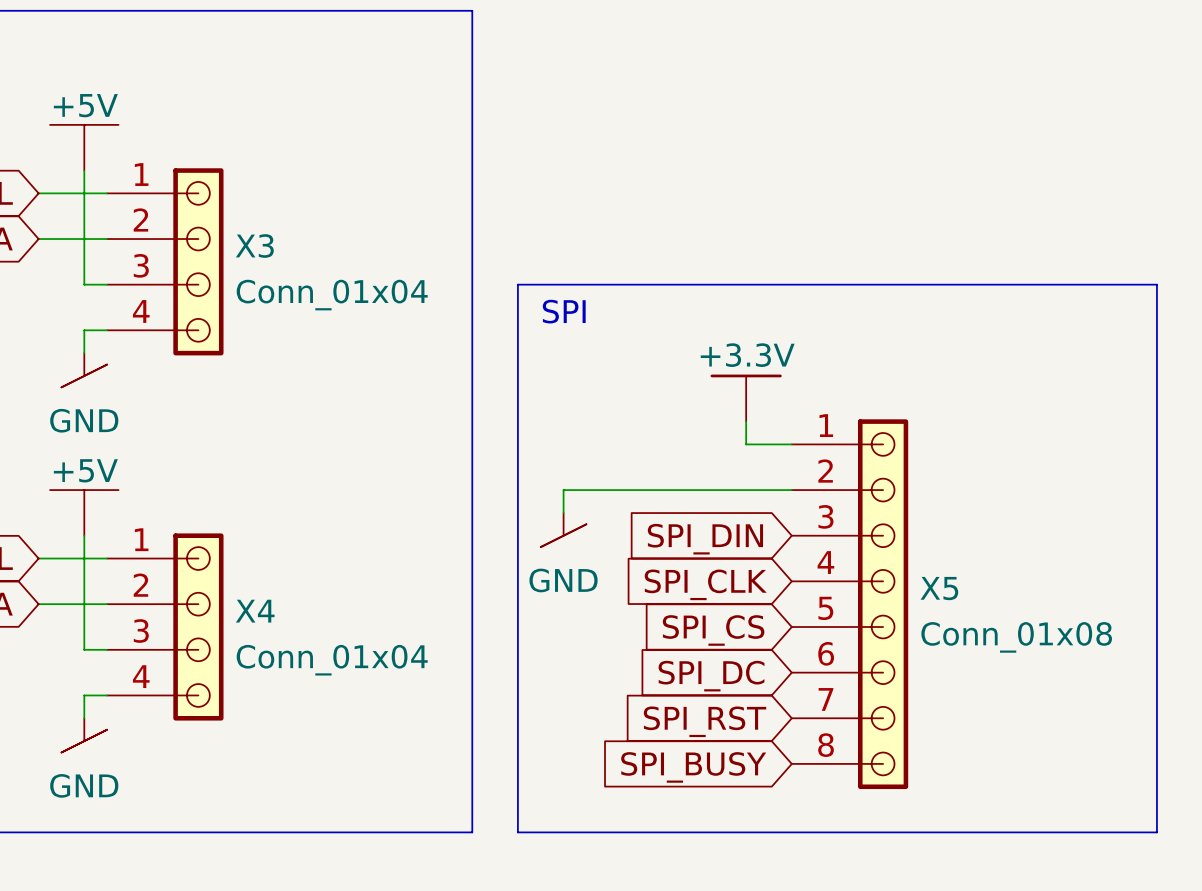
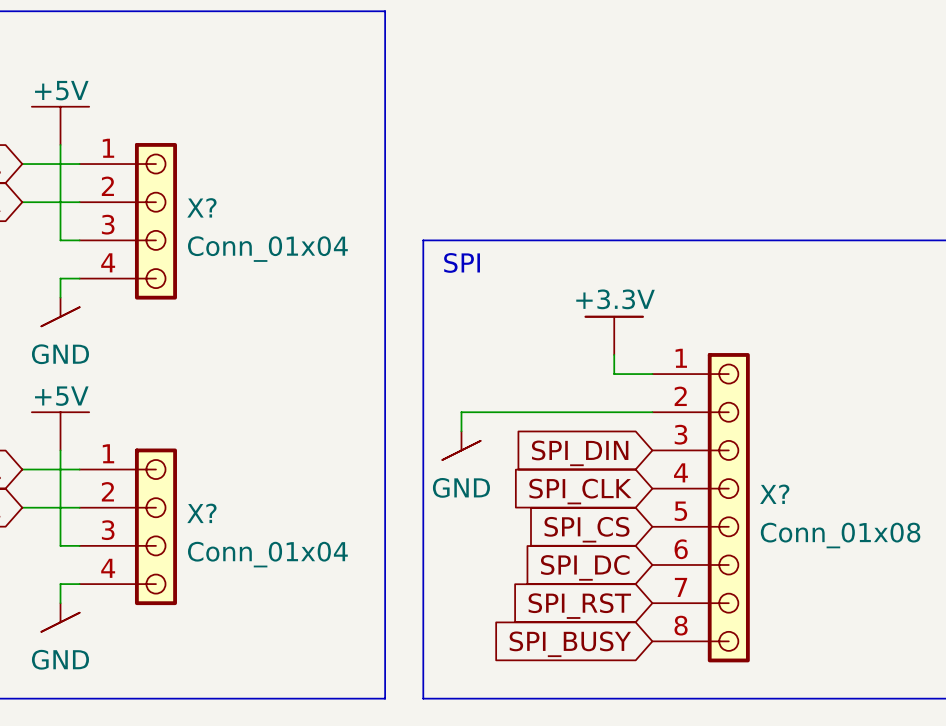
X3 name: X3 (254, 246) -> X? (201, 207)
X5 name: X5 (939, 588) -> X? (774, 494)
X4 name: X4 (255, 611) -> X? (201, 513)

